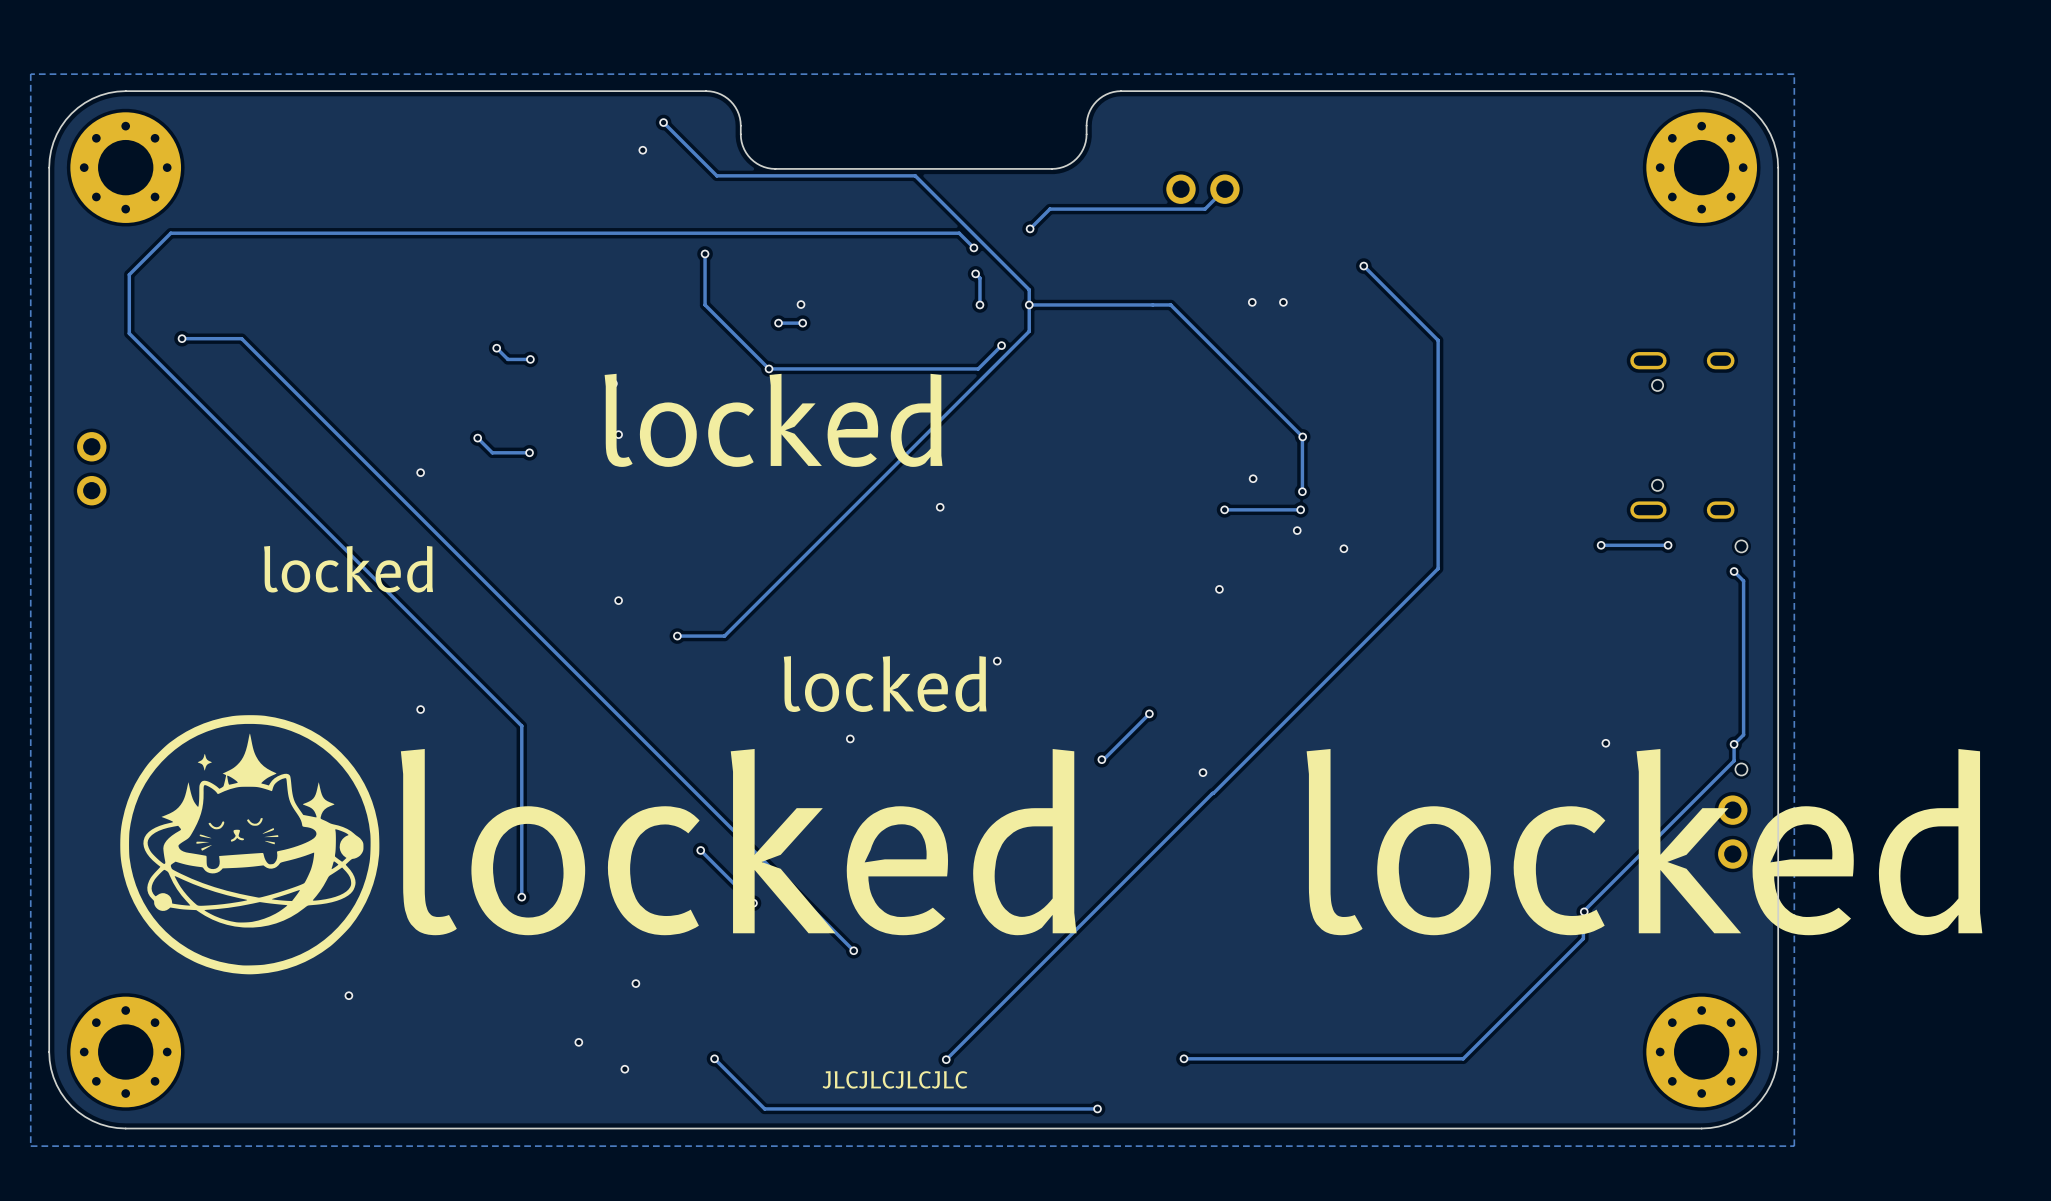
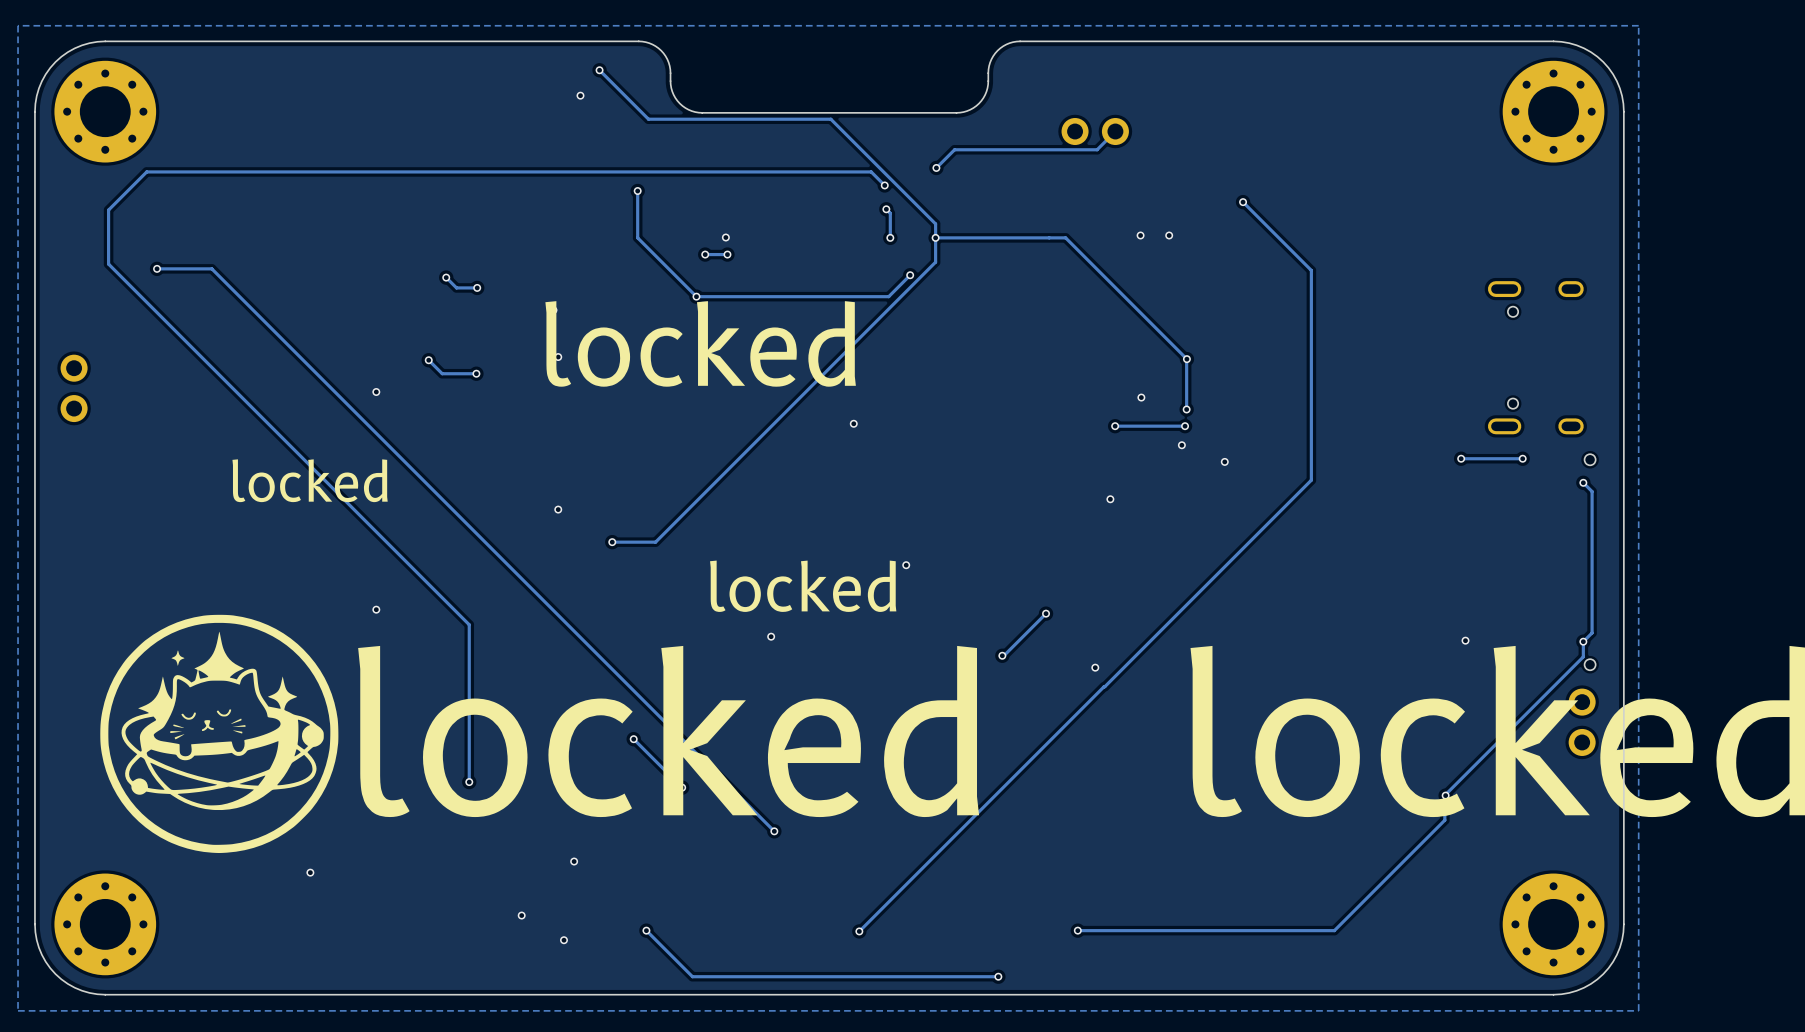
text: JLCJLCJLCJLC (894, 1079) -> none

